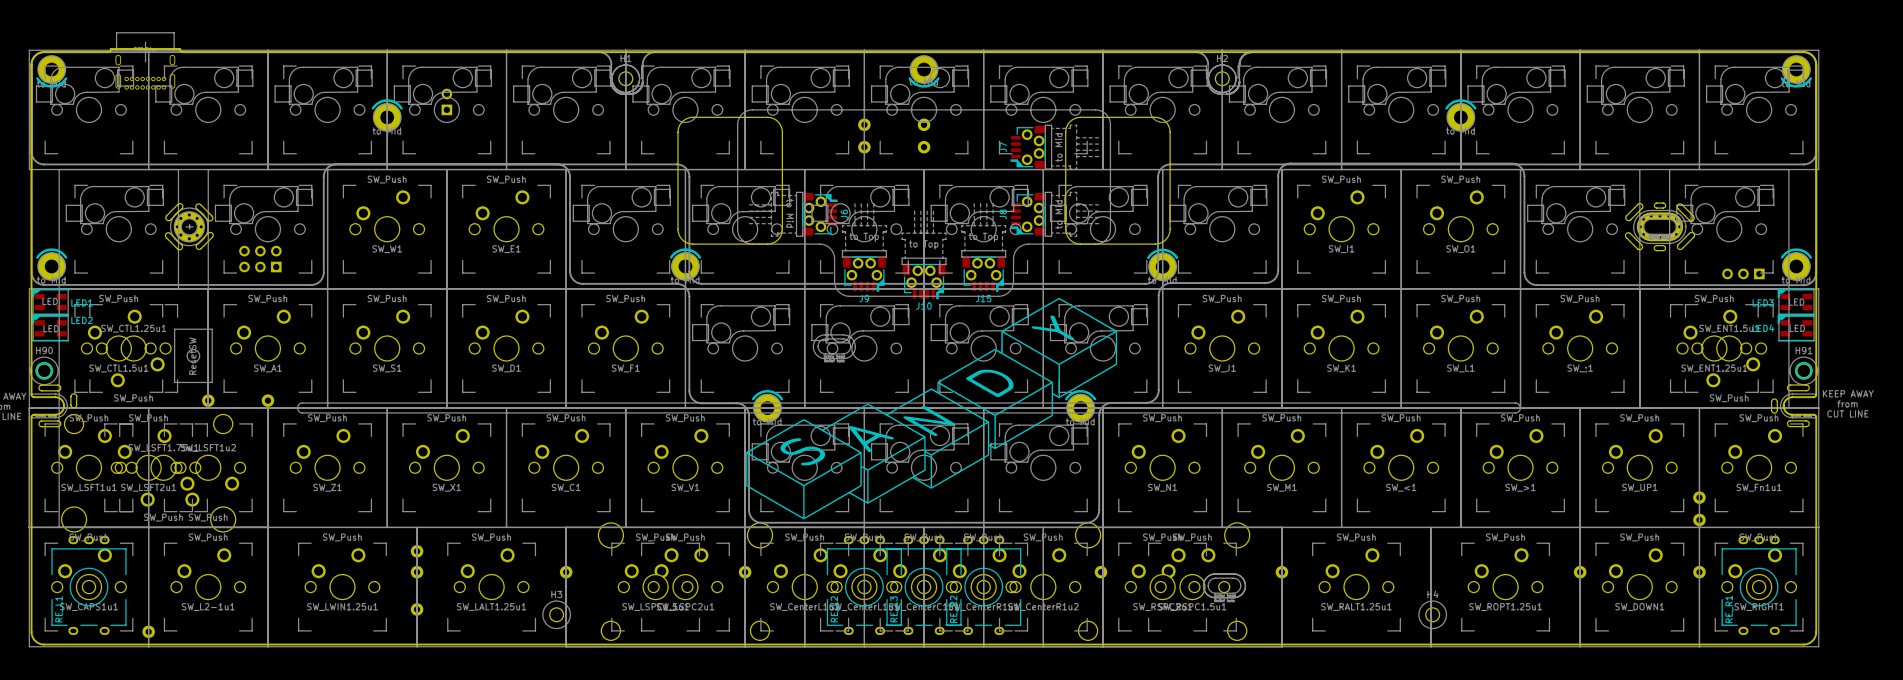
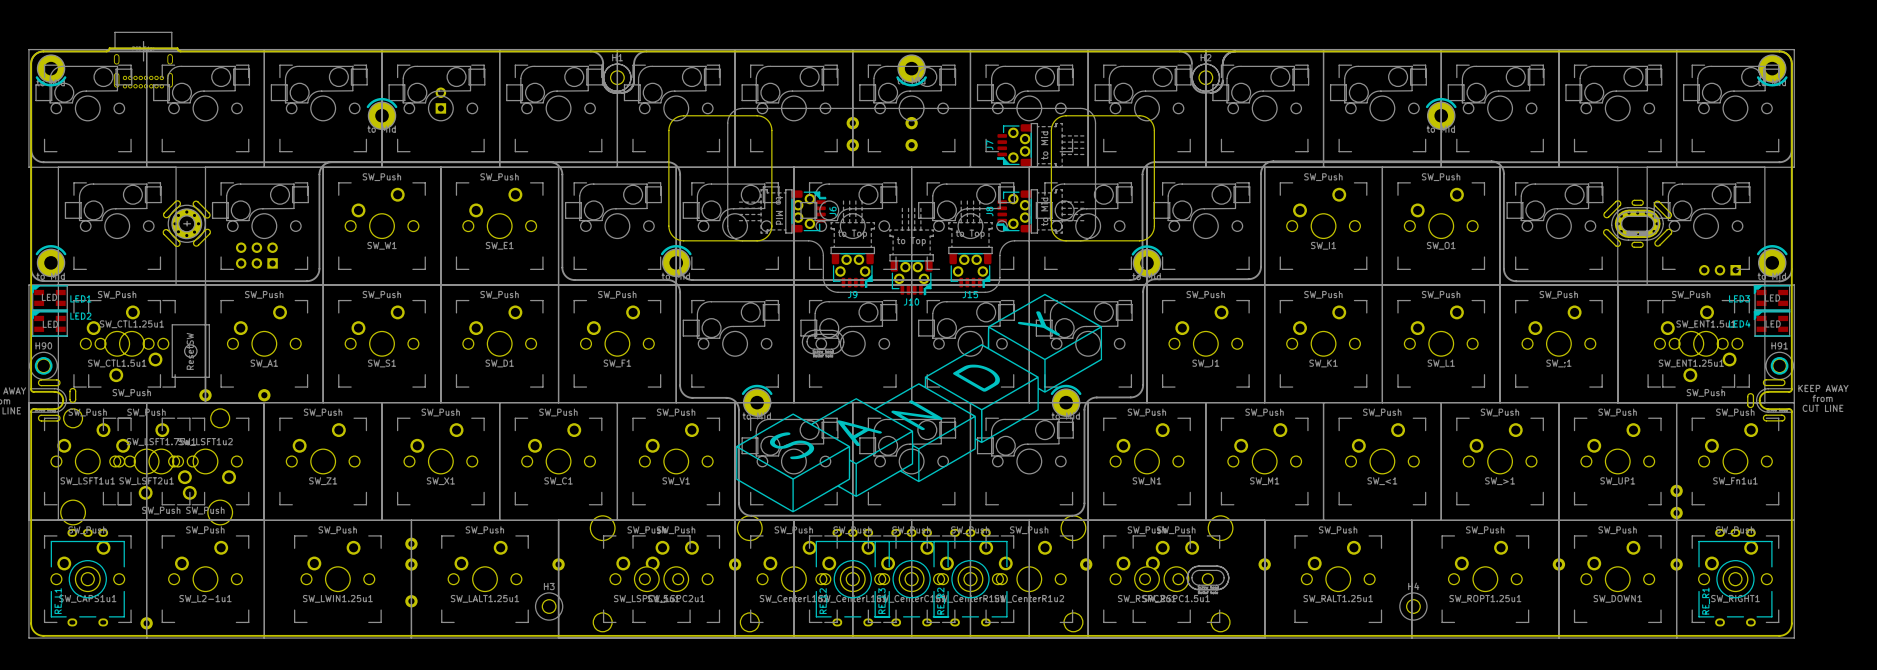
line: (302, 403) (1515, 403) (1520, 407) (1515, 412) (302, 412) (297, 407) (302, 403) -> none

